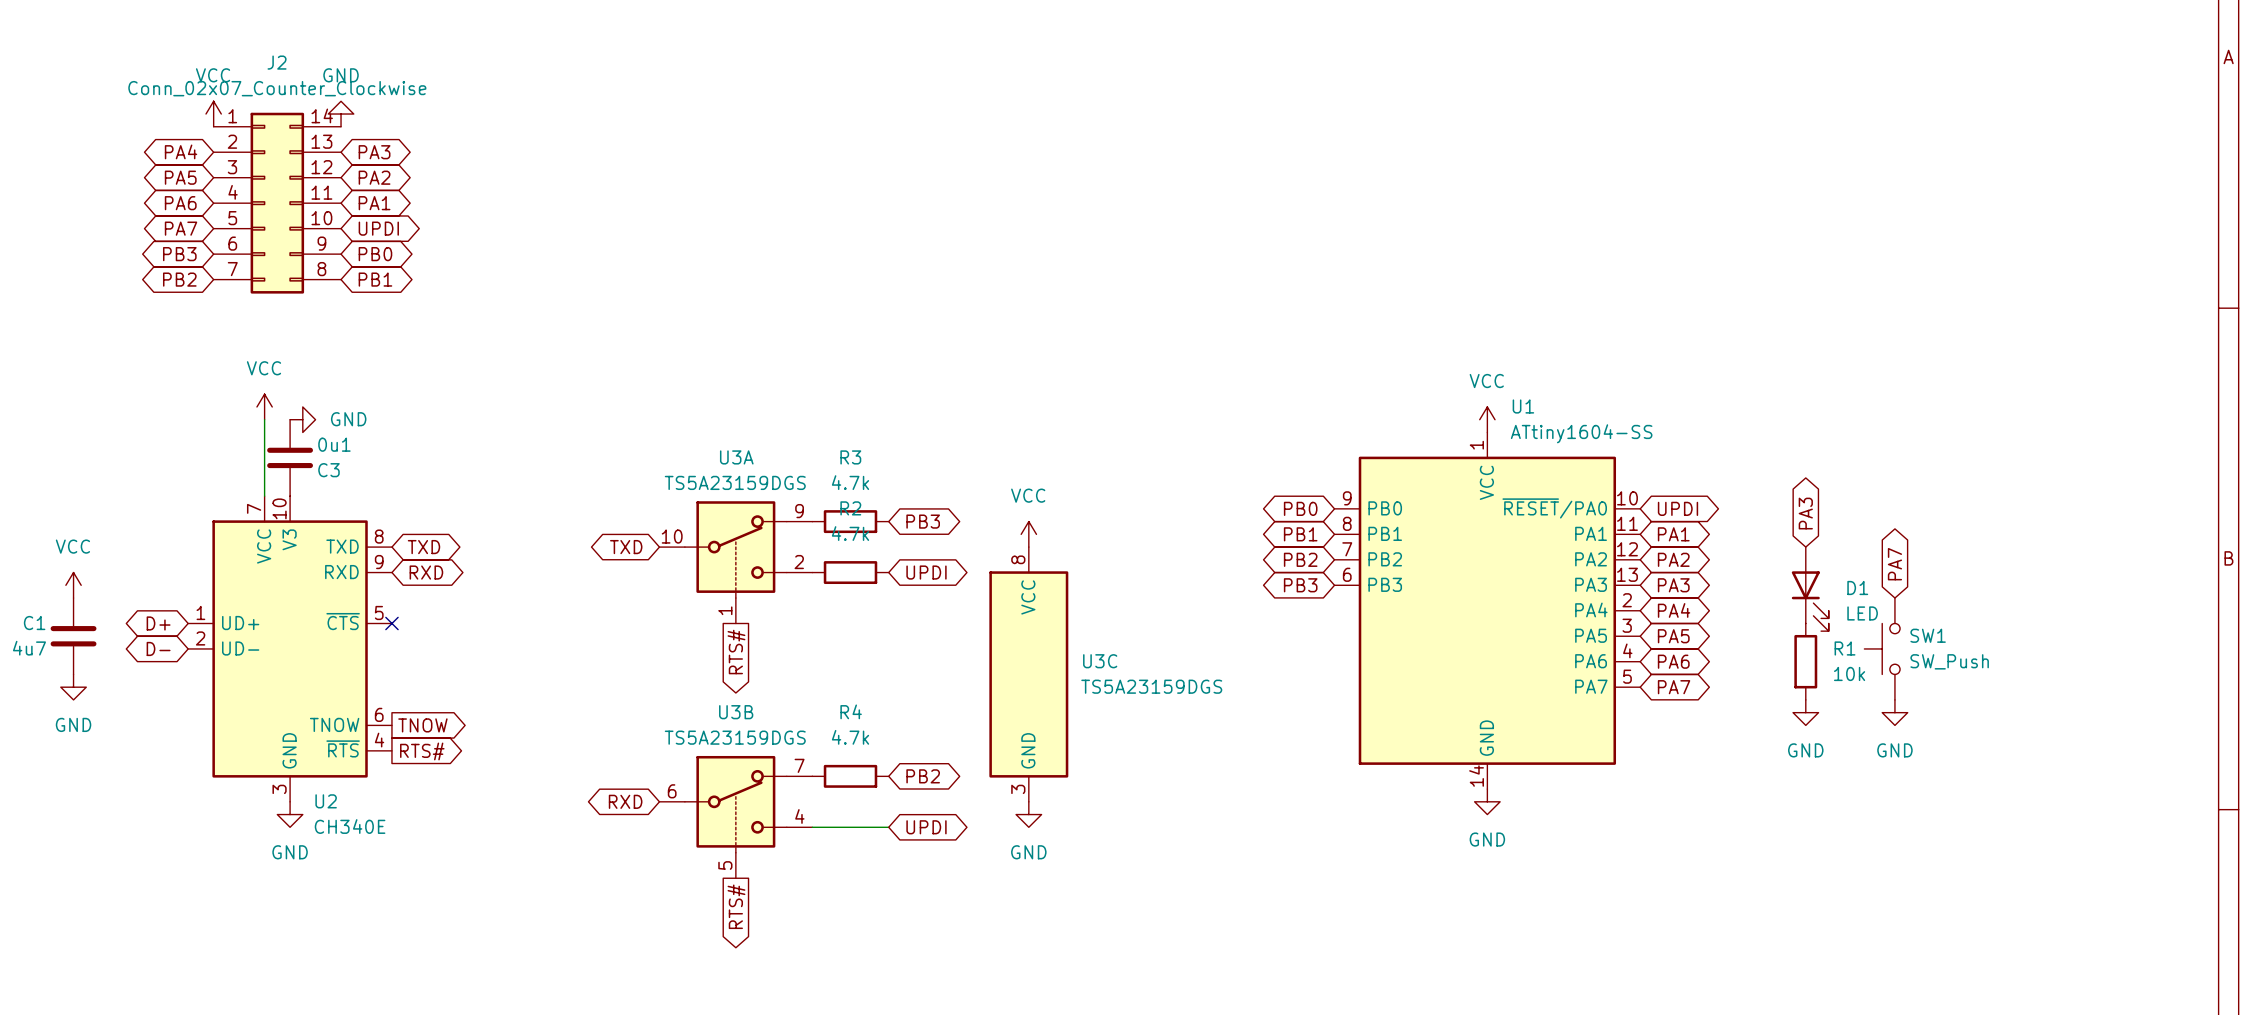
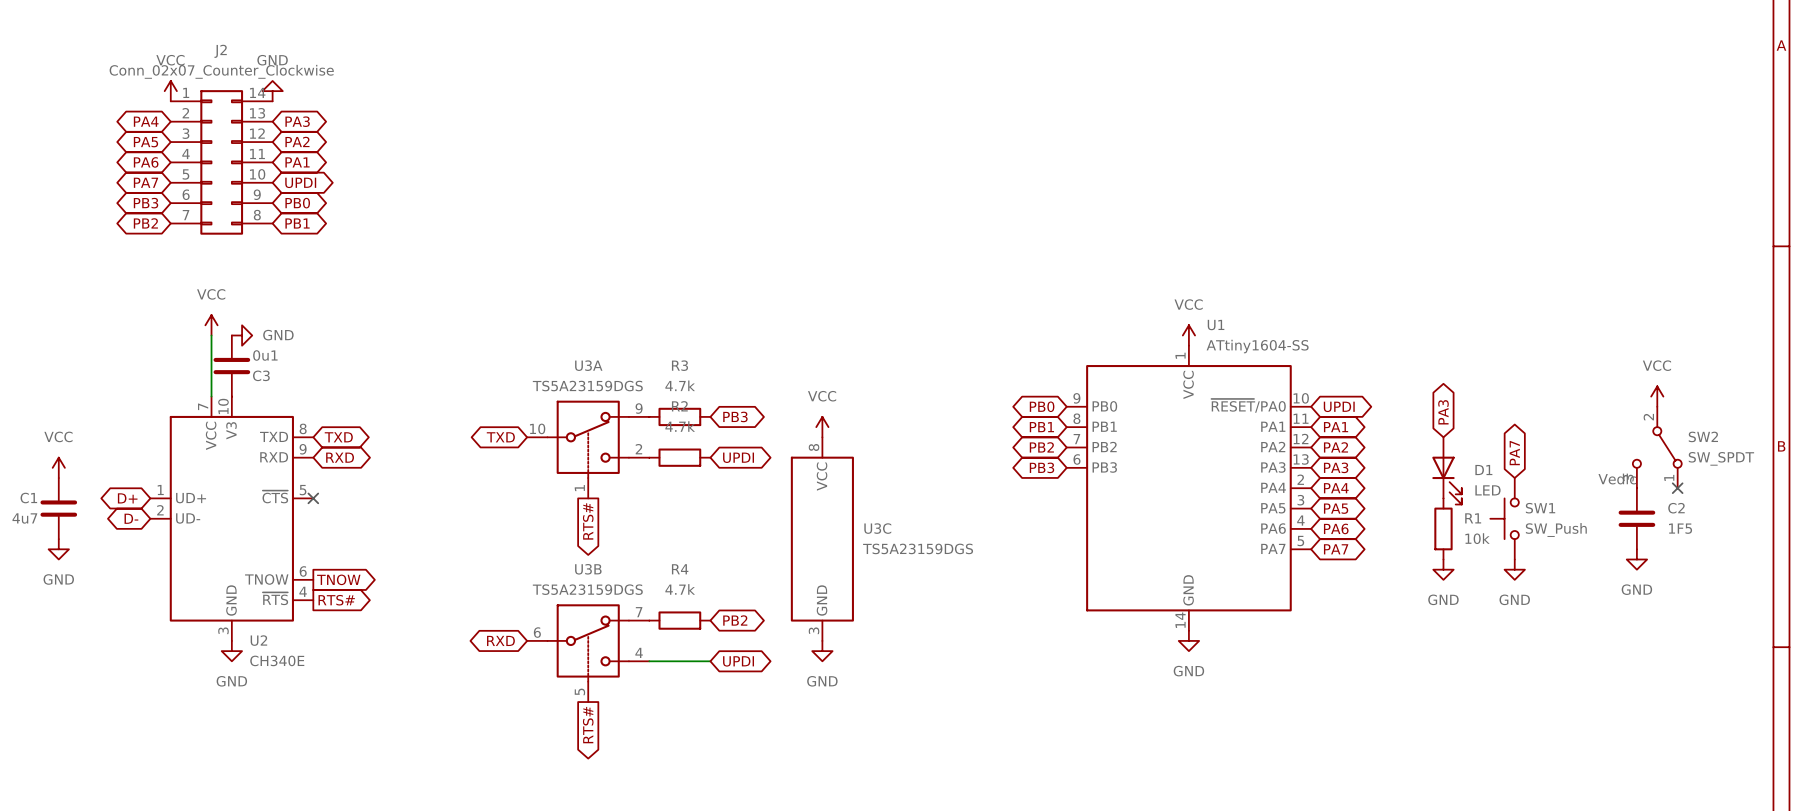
power symbol: none -> VCC (1657, 396)
SW2: none -> SW_SPDT (1657, 447)
label: none -> Vedlc (1617, 479)
no-connect mark: none -> (1677, 488)
C2: none -> 1F5 (1636, 518)
power symbol: none -> GND (1636, 559)

